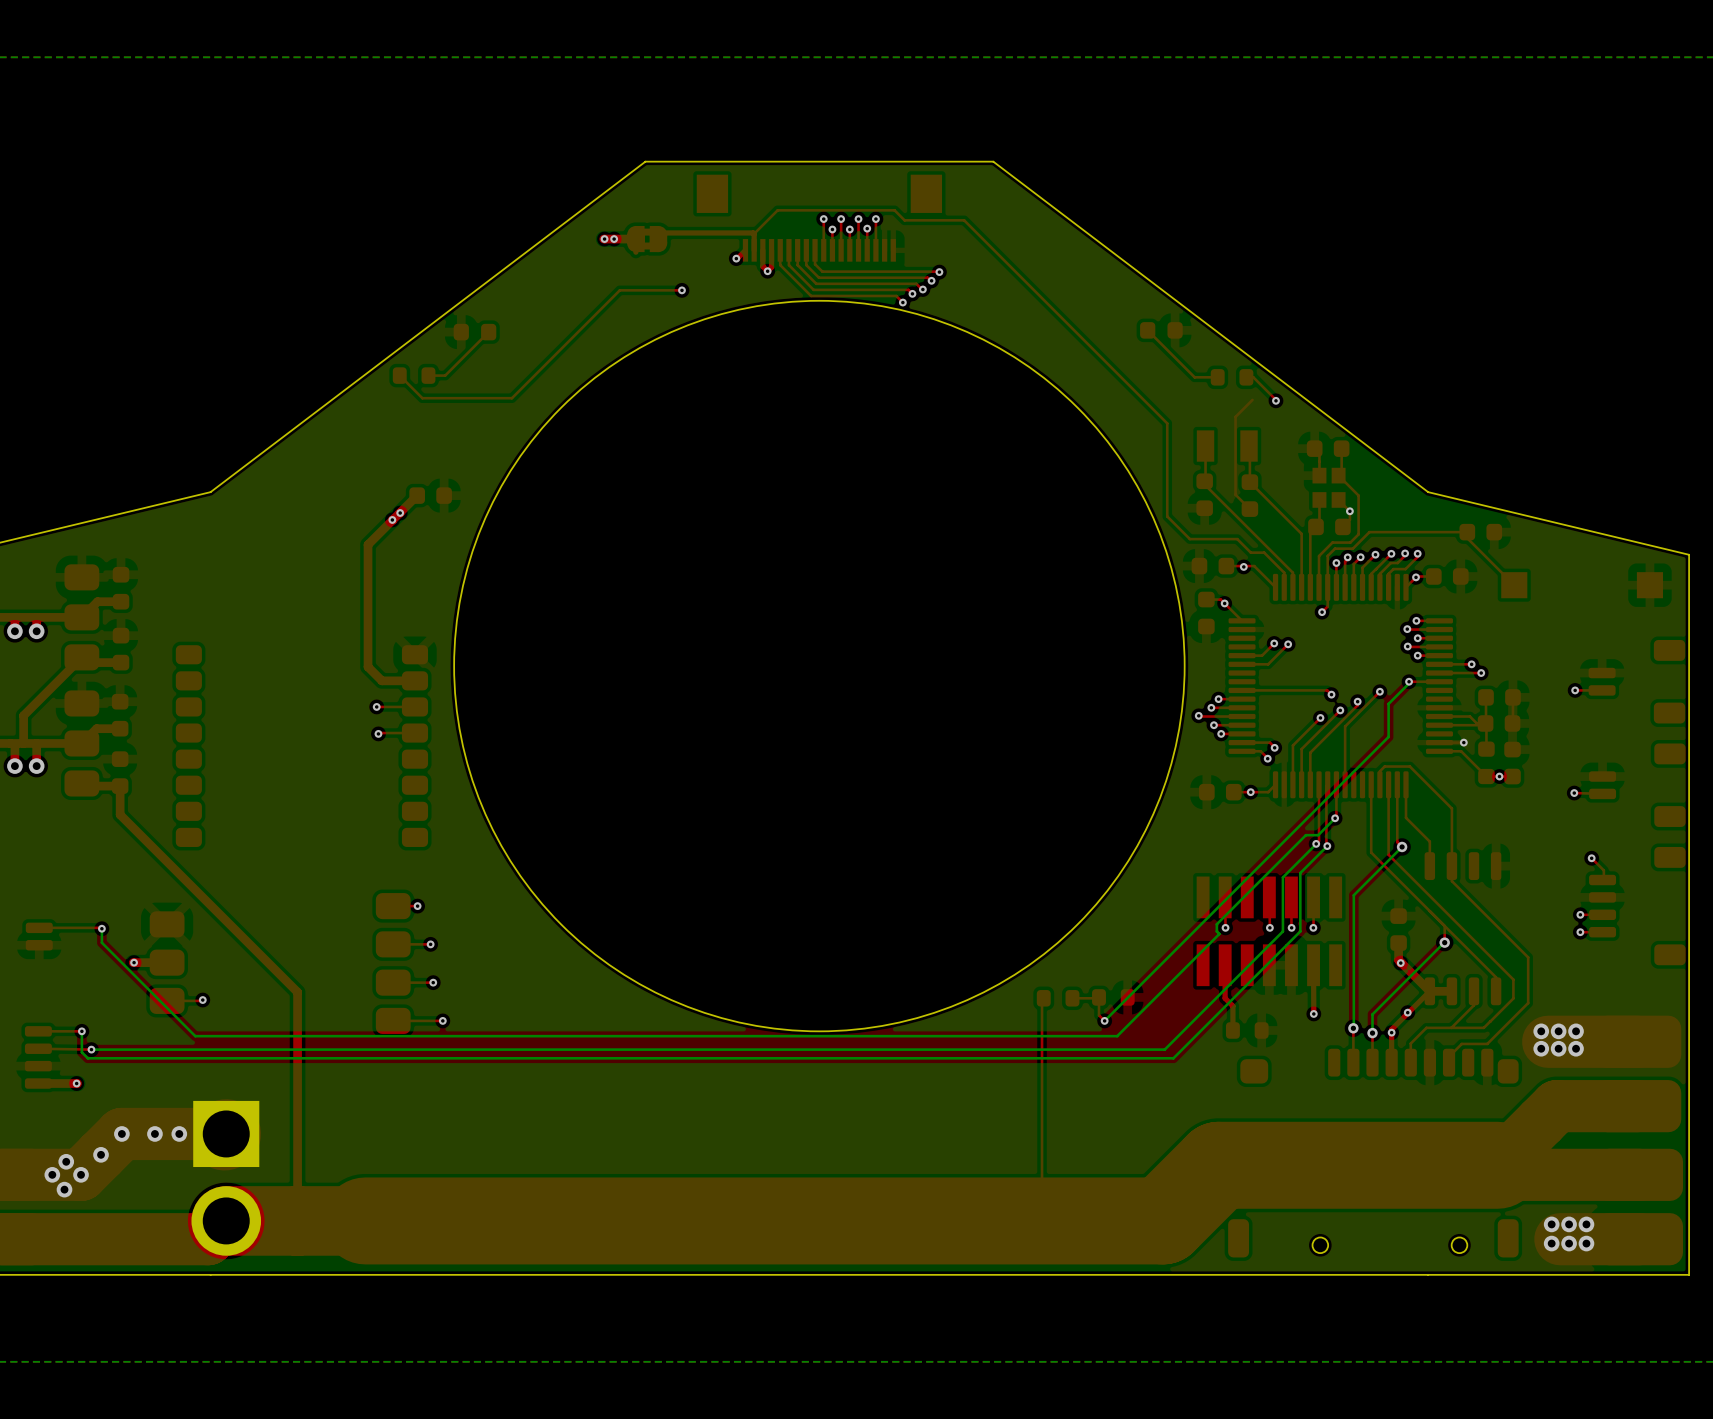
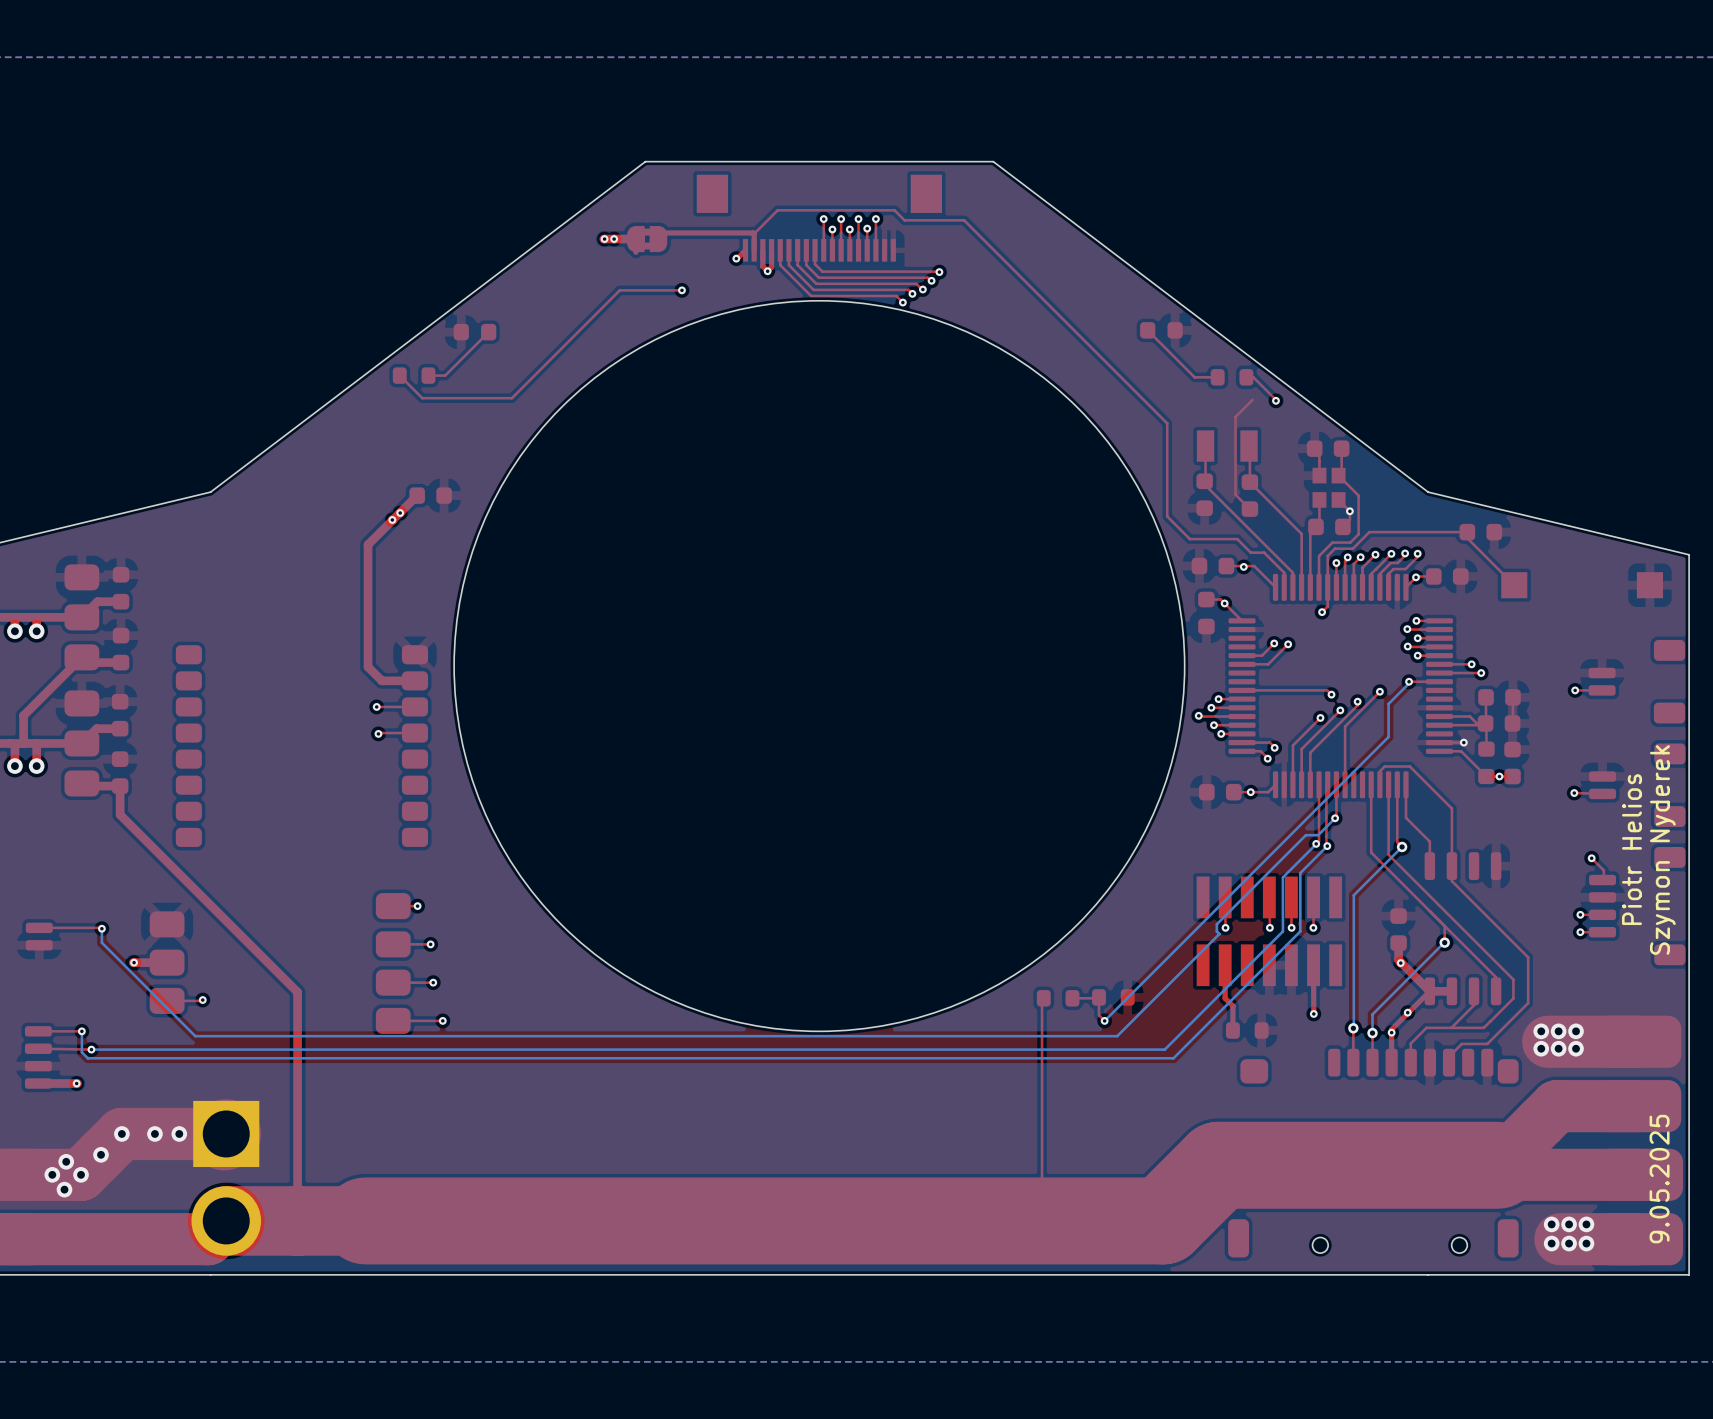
text: none -> Piotr Helios (1631, 849)
text: none -> Szymon Nyderek (1662, 850)
text: none -> 9.05.2025 (1659, 1179)

